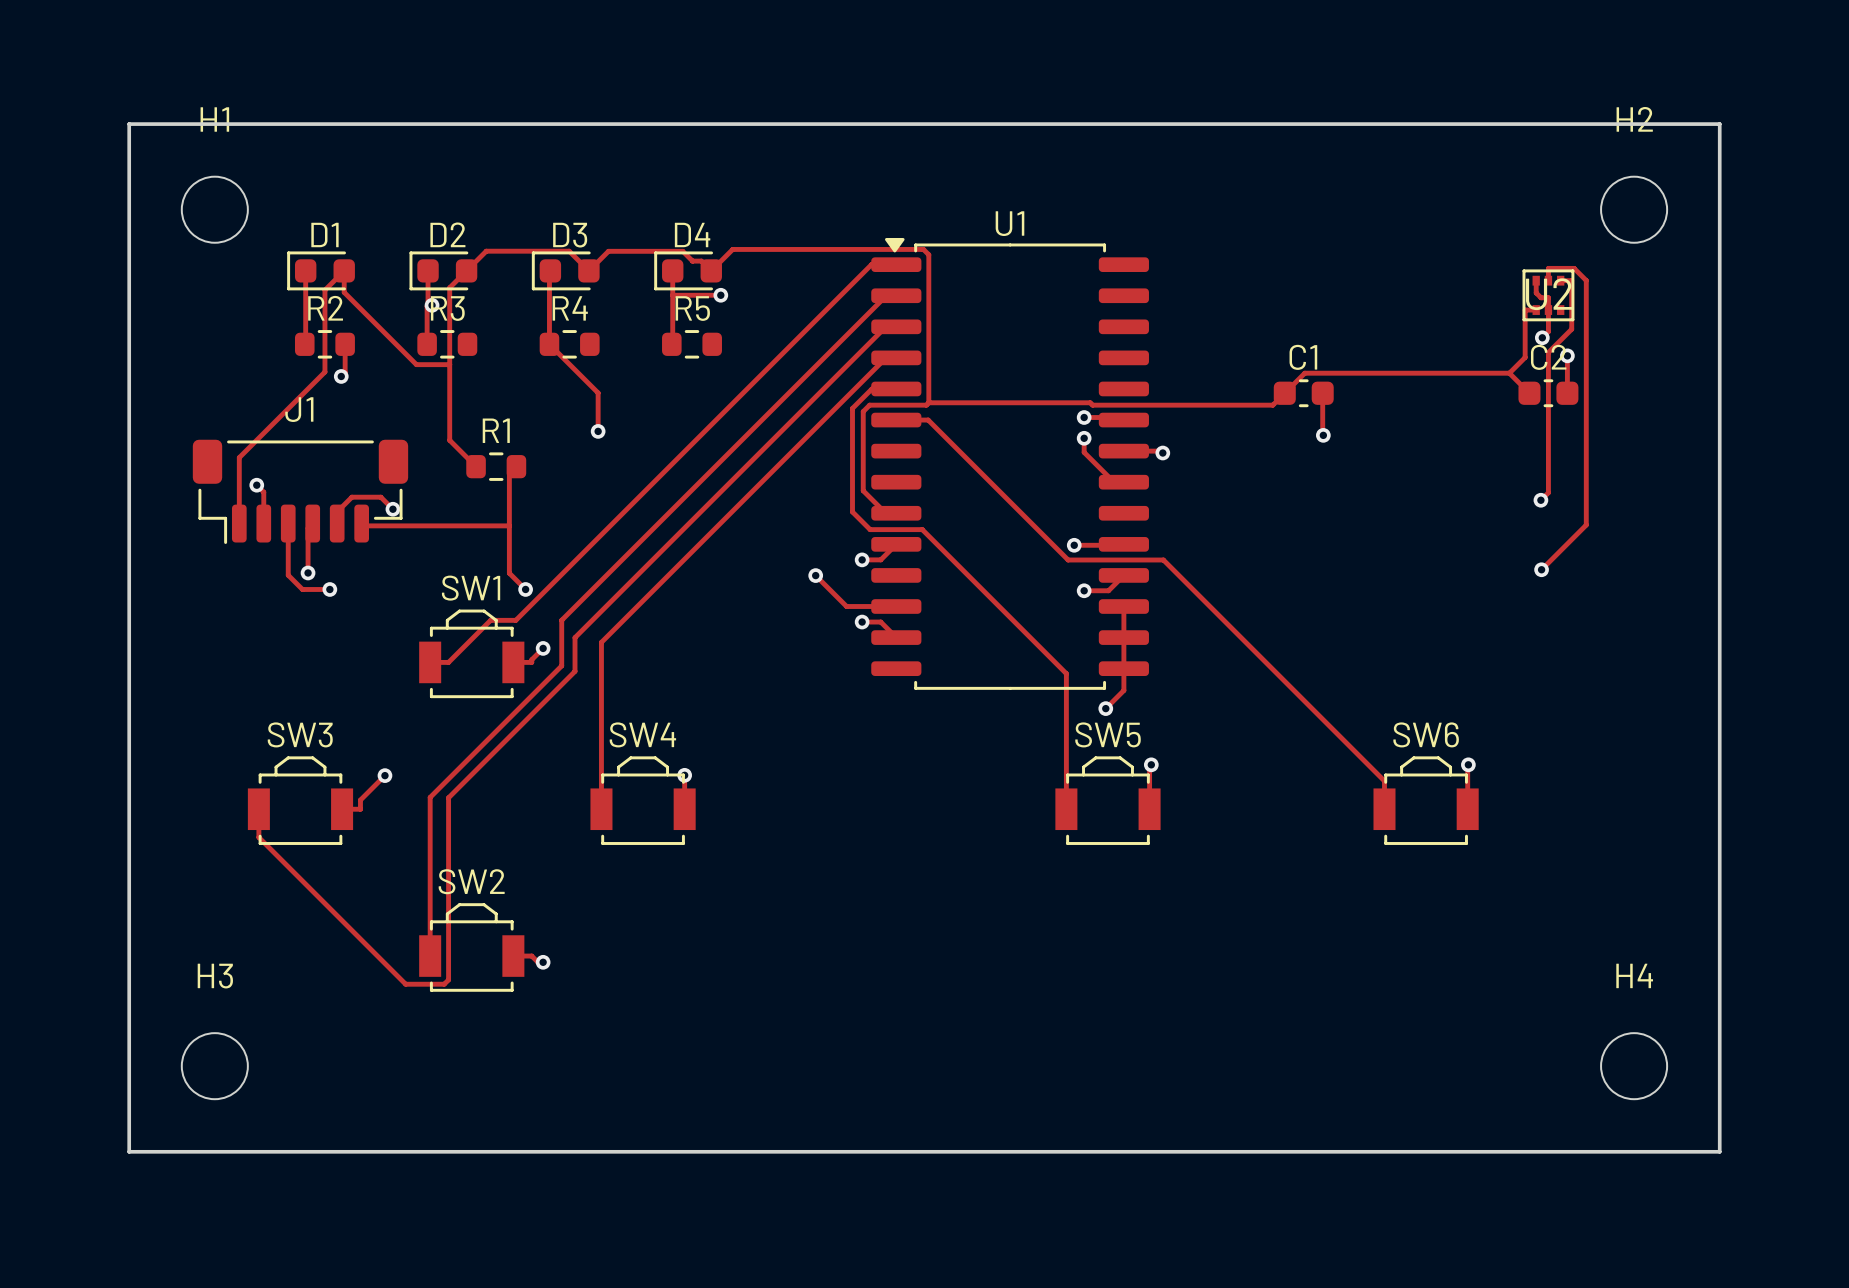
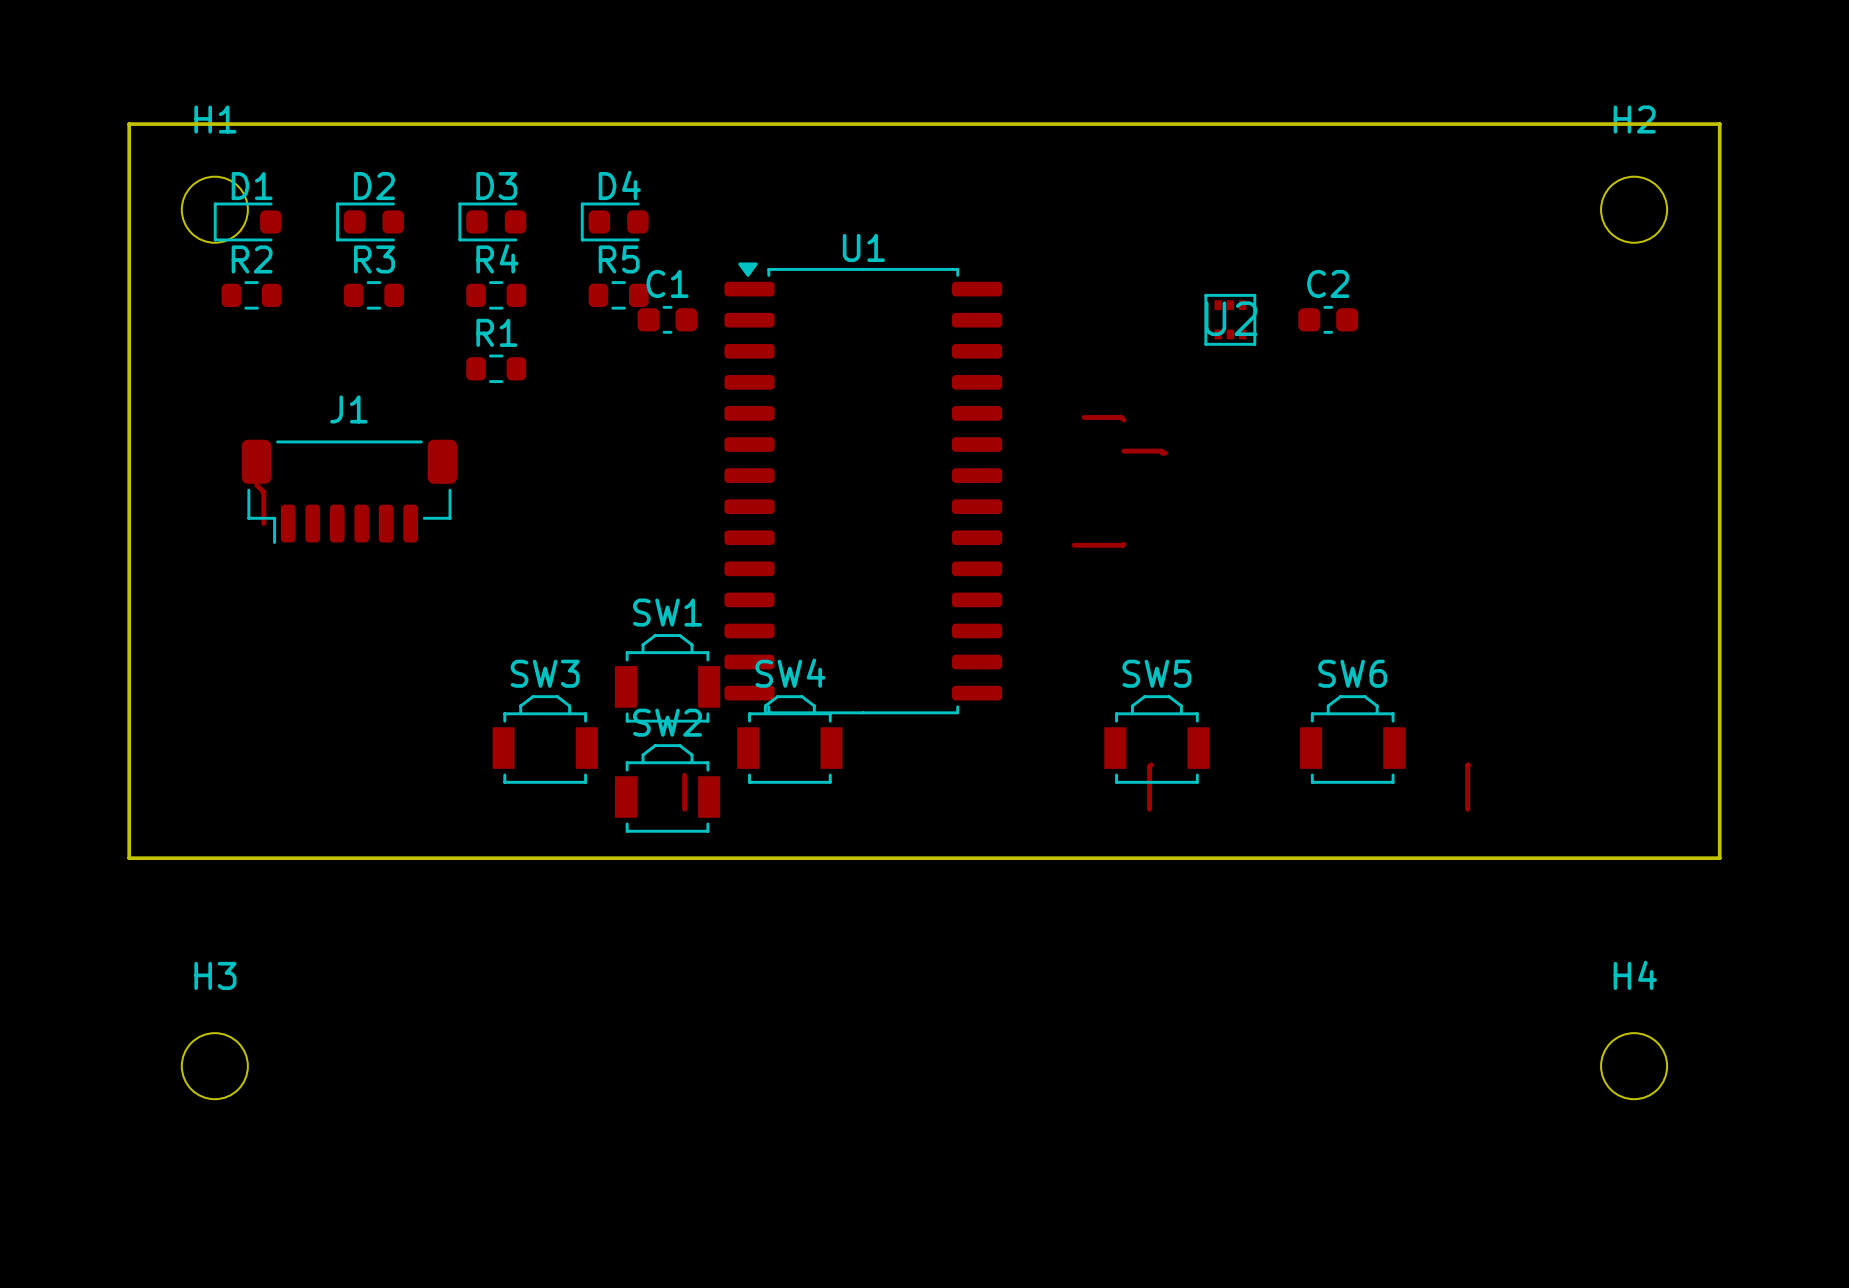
track: (896, 264) (871, 264) (515, 620) (490, 620) (448, 662) (430, 662) -> none
track: (305, 270) (304, 344) -> none
D1 position: (321, 270) -> (247, 221)
track: (428, 270) (428, 305) -> none
D2 position: (443, 270) -> (369, 221)
track: (550, 270) (549, 344) (598, 392) (598, 431) -> none
D3 position: (565, 270) -> (492, 221)
track: (672, 270) (671, 344) -> none
D4 position: (688, 270) -> (614, 221)
track: (1536, 280) (1536, 292) (1541, 297) (1548, 297) (1548, 331) (1542, 337) -> none
track: (1548, 280) (1548, 268) (1574, 268) (1586, 280) (1586, 525) (1541, 569) -> none
track: (1560, 280) (1571, 280) (1571, 329) (1548, 352) (1548, 492) (1540, 500) -> none
track: (672, 295) (720, 295) -> none
via: (720, 295) -> none
track: (896, 295) (886, 295) (561, 620) (561, 665) (430, 797) (430, 956) -> none
U2 position: (1548, 295) -> (1230, 319)
track: (428, 305) (427, 344) -> none
via: (432, 305) -> none
track: (1536, 310) (1525, 310) (1525, 357) (1509, 373) -> none
track: (896, 326) (885, 326) (575, 637) (575, 671) (448, 797) (448, 979) (444, 984) (405, 984) (258, 837) (258, 809) -> none
via: (1542, 337) -> none
R2 position: (324, 344) -> (251, 295)
track: (345, 344) (345, 372) (341, 376) -> none
R3 position: (447, 344) -> (373, 295)
R4 position: (569, 344) -> (496, 295)
R5 position: (692, 344) -> (618, 295)
track: (1567, 355) (1567, 393) -> none
via: (1567, 355) -> none
track: (896, 357) (885, 357) (601, 642) (601, 809) -> none
track: (449, 364) (416, 364) (344, 292) (344, 270) (324, 290) (324, 372) (239, 457) (239, 523) -> none
track: (1509, 373) (1304, 373) (1272, 405) (928, 402) -> none
track: (1509, 373) (1529, 393) -> none
via: (341, 376) -> none
track: (896, 388) (871, 388) (852, 408) (852, 511) (870, 529) (922, 529) (1066, 673) (1066, 809) -> none
C1 position: (1303, 393) -> (667, 319)
track: (1322, 393) (1323, 435) -> none
C2 position: (1548, 393) -> (1328, 319)
track: (928, 402) (928, 254) (923, 249) (732, 249) (711, 270) (701, 261) (692, 261) (682, 251) (608, 251) (588, 270) (569, 251) (486, 251) (449, 287) (449, 440) (476, 466) -> none
track: (928, 402) (926, 405) (869, 405) (863, 411) (863, 490) (885, 513) (896, 513) -> none
via: (1084, 417) -> none
track: (896, 420) (928, 420) (1068, 560) (1163, 560) (1384, 781) (1384, 809) -> none
via: (598, 431) -> none
via: (1323, 435) -> none
track: (1084, 438) (1084, 452) (1113, 482) (1123, 482) -> none
via: (1084, 438) -> none
via: (1162, 453) -> none
U1 position: (1010, 463) -> (863, 488)
R1 position: (496, 466) -> (496, 368)
track: (516, 466) (509, 473) (509, 573) (525, 589) -> none
via: (256, 485) -> none
J1 position: (300, 491) -> (349, 491)
via: (1540, 500) -> none
track: (392, 509) (380, 497) (351, 497) (337, 511) (337, 523) -> none
via: (392, 509) -> none
track: (288, 523) (288, 575) (302, 589) (329, 589) -> none
track: (312, 523) (308, 528) (308, 572) -> none
track: (361, 523) (363, 525) (509, 525) -> none
track: (896, 544) (880, 559) (862, 559) -> none
via: (1074, 545) -> none
via: (862, 559) -> none
via: (1541, 569) -> none
via: (308, 572) -> none
track: (815, 575) (846, 606) (896, 606) -> none
via: (815, 575) -> none
track: (1123, 575) (1108, 590) (1084, 590) -> none
via: (329, 589) -> none
via: (525, 589) -> none
via: (1084, 590) -> none
track: (1123, 606) (1123, 690) (1105, 708) -> none
track: (862, 622) (880, 622) (896, 637) -> none
via: (862, 622) -> none
track: (543, 648) (531, 659) (531, 662) (513, 662) -> none
via: (543, 648) -> none
SW1 position: (471, 653) -> (667, 678)
via: (1105, 708) -> none
via: (1151, 764) -> none
via: (1468, 764) -> none
track: (384, 775) (360, 800) (360, 809) (342, 809) -> none
via: (384, 775) -> none
via: (684, 775) -> none
SW3 position: (300, 800) -> (545, 739)
SW4 position: (643, 800) -> (789, 739)
SW5 position: (1107, 800) -> (1156, 739)
SW6 position: (1426, 800) -> (1352, 739)
board edge: (129, 858) (129, 1151) (1719, 1151) (1719, 858) -> (129, 858) (1719, 858)
SW2 position: (471, 947) -> (667, 788)
track: (513, 956) (531, 956) (538, 962) (543, 962) -> none
via: (543, 962) -> none

